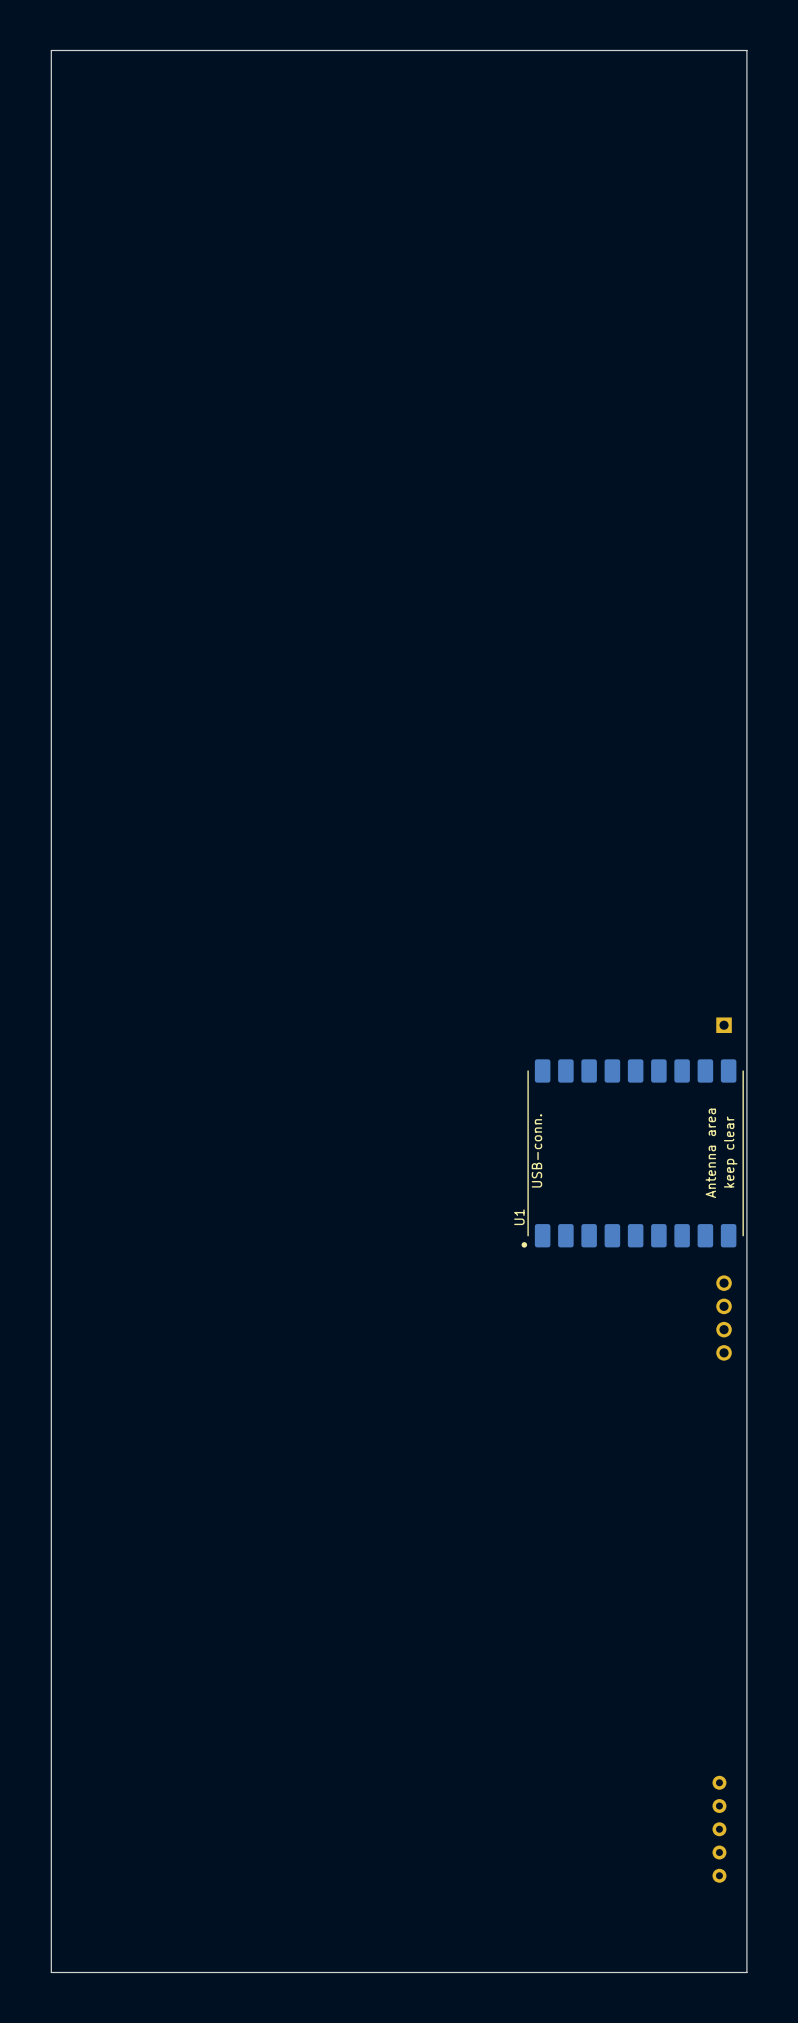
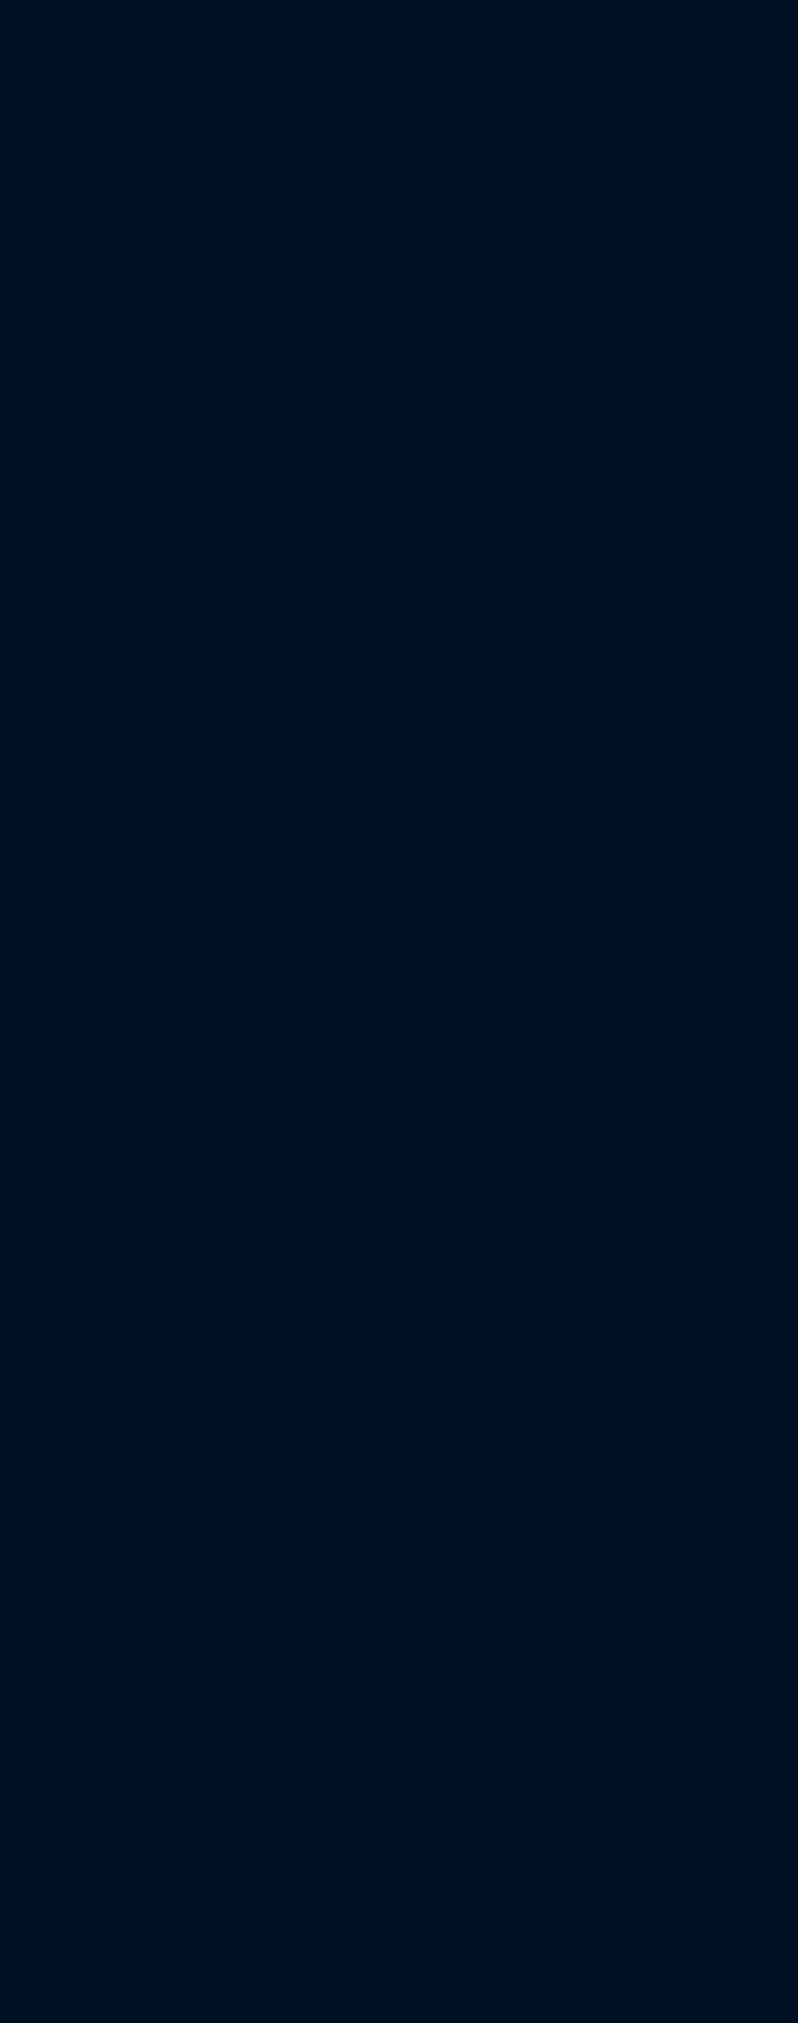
board edge: (746, 50) (746, 1972) (51, 1972) (51, 50) (746, 50) -> none
part: (724, 1025) -> none
U1: (632, 1153) -> none
part: (724, 1318) -> none
part: (719, 1829) -> none

